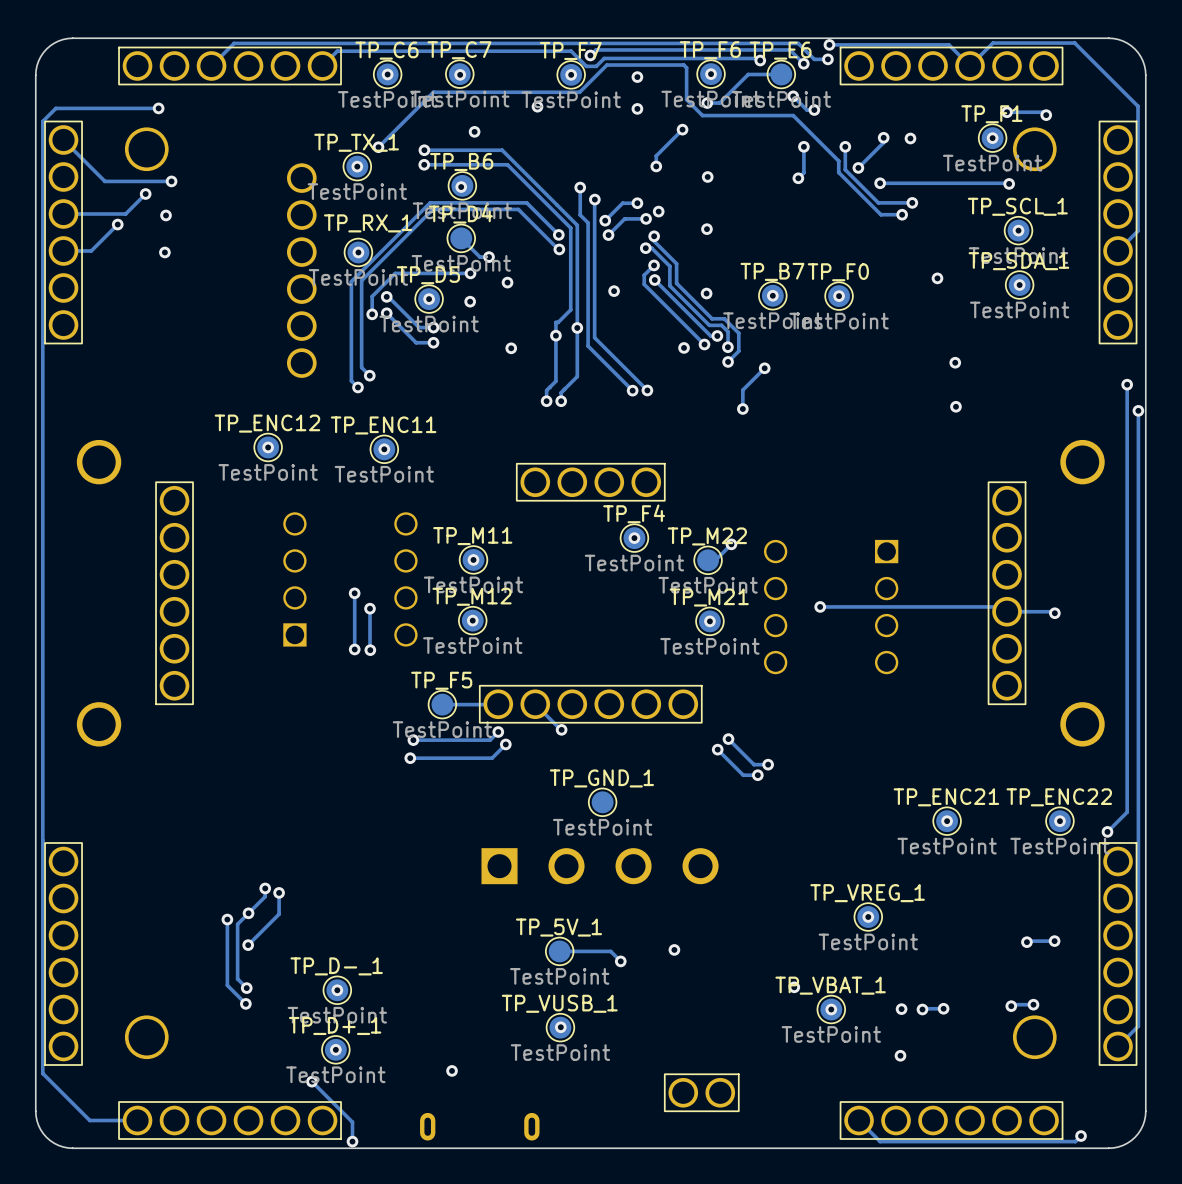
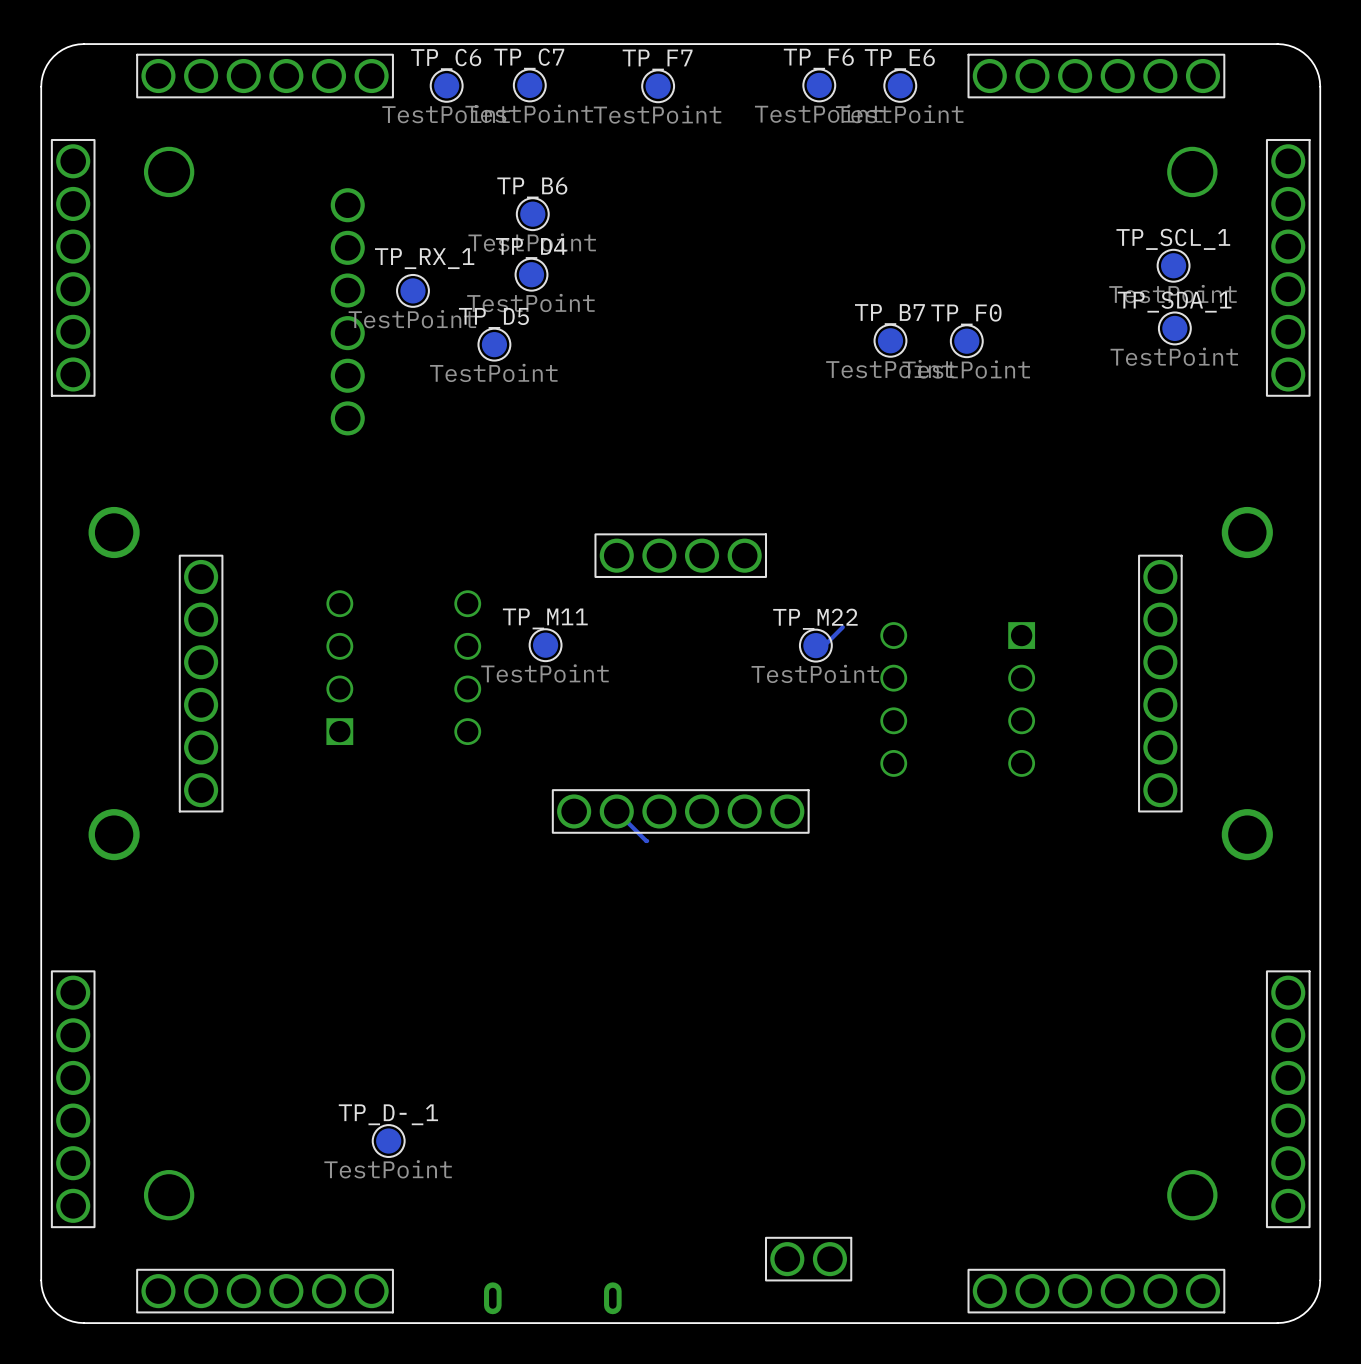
track: (829, 44) (948, 44) (970, 65) (992, 43) (1074, 43) (1138, 106) (1138, 231) (1118, 250) -> none
via: (829, 44) -> none
track: (590, 55) (595, 49) (789, 49) (803, 63) -> none
via: (590, 55) -> none
track: (827, 59) (814, 59) (798, 43) (234, 43) (211, 65) -> none
via: (827, 59) -> none
track: (760, 60) (758, 58) (604, 58) (596, 66) (586, 66) (571, 51) (337, 51) (322, 65) -> none
via: (760, 60) -> none
via: (803, 63) -> none
via: (387, 74) -> none
via: (460, 74) -> none
via: (571, 74) -> none
via: (711, 74) -> none
track: (781, 74) (748, 74) (719, 103) (707, 103) -> none
via: (637, 77) -> none
track: (793, 96) (806, 110) (814, 110) -> none
via: (793, 96) -> none
via: (707, 103) -> none
via: (537, 106) -> none
track: (158, 108) (55, 108) (42, 121) (42, 1073) (89, 1120) (137, 1120) -> none
via: (158, 108) -> none
via: (637, 108) -> none
via: (814, 110) -> none
track: (1007, 112) (1043, 112) (1046, 115) -> none
via: (1007, 112) -> none
via: (1046, 115) -> none
track: (682, 129) (656, 155) (656, 166) -> none
via: (682, 129) -> none
via: (474, 131) -> none
track: (883, 137) (883, 142) (858, 167) -> none
via: (883, 137) -> none
via: (910, 138) -> none
TP_F1: TestPoint (992, 138) -> none
via: (992, 138) -> none
track: (63, 139) (104, 181) (171, 181) -> none
track: (803, 146) (803, 172) (798, 178) -> none
via: (803, 146) -> none
track: (845, 146) (845, 169) (878, 202) (912, 202) -> none
via: (845, 146) -> none
track: (378, 147) (433, 92) (579, 92) (606, 65) (683, 65) (686, 67) (686, 99) (702, 115) (793, 115) (838, 161) (838, 172) (880, 214) (902, 214) -> none
via: (378, 147) -> none
track: (424, 150) (502, 150) (577, 225) (577, 376) (561, 392) (561, 401) -> none
via: (424, 150) -> none
track: (424, 164) (507, 164) (570, 228) (570, 309) (555, 322) (555, 381) (546, 390) (546, 401) -> none
via: (424, 164) -> none
TP_TX_1: TestPoint (357, 166) -> none
via: (357, 166) -> none
via: (656, 166) -> none
via: (858, 167) -> none
via: (707, 176) -> none
via: (798, 178) -> none
via: (171, 181) -> none
track: (880, 183) (1009, 183) -> none
via: (880, 183) -> none
via: (1009, 183) -> none
via: (461, 187) -> none
track: (580, 187) (580, 214) (588, 222) (588, 346) (632, 390) -> none
via: (580, 187) -> none
track: (145, 194) (125, 213) (63, 213) -> none
via: (145, 194) -> none
track: (594, 199) (594, 337) (647, 390) -> none
via: (594, 199) -> none
via: (912, 202) -> none
track: (637, 203) (622, 203) (605, 220) -> none
via: (637, 203) -> none
via: (658, 211) -> none
via: (902, 214) -> none
via: (166, 215) -> none
track: (646, 218) (624, 218) (608, 235) -> none
via: (646, 218) -> none
via: (605, 220) -> none
track: (117, 224) (91, 250) (63, 250) -> none
via: (117, 224) -> none
via: (706, 229) -> none
via: (1018, 230) -> none
track: (558, 234) (526, 202) (430, 202) (351, 281) (351, 380) (357, 387) -> none
via: (558, 234) -> none
via: (608, 235) -> none
track: (654, 236) (654, 241) (676, 263) (676, 283) (712, 318) (724, 318) (738, 333) (738, 351) (728, 361) -> none
via: (654, 236) -> none
track: (461, 238) (479, 257) (489, 257) -> none
track: (645, 248) (651, 248) (669, 266) (669, 285) (709, 325) (721, 325) (728, 331) (728, 347) -> none
via: (645, 248) -> none
track: (559, 249) (518, 209) (432, 209) (361, 280) (361, 367) (369, 375) -> none
via: (559, 249) -> none
via: (164, 252) -> none
via: (358, 252) -> none
via: (489, 257) -> none
track: (654, 265) (644, 275) (644, 284) (704, 344) -> none
via: (654, 265) -> none
track: (470, 273) (395, 273) (372, 296) (372, 314) -> none
via: (470, 273) -> none
via: (937, 278) -> none
track: (654, 280) (710, 335) (717, 335) -> none
via: (654, 280) -> none
via: (507, 282) -> none
via: (1019, 285) -> none
via: (614, 291) -> none
via: (706, 293) -> none
via: (772, 295) -> none
track: (386, 296) (419, 327) (433, 327) -> none
via: (386, 296) -> none
via: (839, 296) -> none
via: (429, 299) -> none
via: (470, 301) -> none
track: (386, 313) (416, 342) (433, 342) -> none
via: (386, 313) -> none
via: (372, 314) -> none
via: (433, 327) -> none
via: (577, 327) -> none
via: (555, 335) -> none
via: (717, 335) -> none
via: (433, 342) -> none
via: (704, 344) -> none
via: (684, 347) -> none
via: (727, 347) -> none
via: (511, 348) -> none
via: (728, 361) -> none
via: (955, 362) -> none
track: (764, 368) (742, 390) (742, 408) -> none
via: (764, 368) -> none
via: (369, 375) -> none
track: (1127, 384) (1127, 812) (1107, 831) -> none
via: (1127, 384) -> none
via: (357, 387) -> none
via: (632, 390) -> none
via: (647, 390) -> none
via: (546, 401) -> none
via: (561, 401) -> none
via: (955, 406) -> none
via: (742, 408) -> none
track: (1138, 410) (1138, 1026) (1118, 1046) -> none
via: (1138, 410) -> none
TP_ENC12: TestPoint (268, 447) -> none
via: (268, 447) -> none
TP_ENC11: TestPoint (384, 449) -> none
via: (384, 449) -> none
TP_F4: TestPoint (634, 538) -> none
via: (634, 538) -> none
via: (731, 544) -> none
via: (473, 559) -> none
track: (354, 593) (354, 649) -> none
via: (354, 593) -> none
track: (820, 606) (1002, 606) (1007, 611) (1054, 613) -> none
via: (820, 606) -> none
track: (370, 608) (370, 650) -> none
via: (370, 608) -> none
via: (1054, 613) -> none
TP_M12: TestPoint (472, 620) -> none
via: (472, 620) -> none
TP_M21: TestPoint (709, 621) -> none
via: (709, 621) -> none
via: (354, 649) -> none
via: (370, 650) -> none
TP_F5: TestPoint (442, 704) -> none
track: (498, 704) (442, 704) -> none
via: (561, 729) -> none
track: (498, 732) (490, 740) (413, 740) -> none
via: (498, 732) -> none
track: (728, 739) (754, 764) (768, 764) -> none
via: (728, 739) -> none
via: (413, 740) -> none
track: (505, 744) (492, 758) (410, 758) -> none
via: (505, 744) -> none
track: (717, 749) (743, 775) (757, 775) -> none
via: (717, 749) -> none
via: (410, 758) -> none
via: (768, 764) -> none
via: (757, 775) -> none
TP_GND_1: TestPoint (602, 802) -> none
TP_ENC21: TestPoint (947, 821) -> none
via: (947, 821) -> none
TP_ENC22: TestPoint (1059, 821) -> none
via: (1059, 821) -> none
via: (1107, 831) -> none
part: (600, 866) -> none
track: (265, 888) (265, 896) (237, 924) (237, 978) (246, 988) -> none
via: (265, 888) -> none
track: (279, 892) (279, 914) (248, 945) -> none
via: (279, 892) -> none
via: (248, 913) -> none
TP_VREG_1: TestPoint (868, 917) -> none
via: (868, 917) -> none
track: (227, 919) (227, 985) (245, 1003) -> none
via: (227, 919) -> none
track: (1054, 941) (1026, 942) -> none
via: (1054, 941) -> none
via: (1026, 942) -> none
via: (248, 945) -> none
via: (674, 949) -> none
track: (559, 951) (610, 951) (620, 961) -> none
TP_5V_1: TestPoint (559, 951) -> none
via: (620, 961) -> none
via: (794, 987) -> none
via: (246, 988) -> none
via: (337, 990) -> none
via: (245, 1003) -> none
track: (1033, 1004) (1011, 1006) -> none
via: (1033, 1004) -> none
via: (1011, 1006) -> none
track: (943, 1008) (922, 1009) -> none
via: (943, 1008) -> none
TP_VBAT_1: TestPoint (831, 1009) -> none
via: (831, 1009) -> none
via: (901, 1009) -> none
via: (922, 1009) -> none
TP_VUSB_1: TestPoint (560, 1027) -> none
via: (560, 1027) -> none
TP_D+_1: TestPoint (335, 1049) -> none
via: (335, 1049) -> none
via: (900, 1055) -> none
via: (452, 1070) -> none
track: (311, 1081) (352, 1122) (352, 1141) -> none
via: (311, 1081) -> none
track: (859, 1120) (880, 1141) (1075, 1141) (1081, 1136) -> none
via: (1081, 1136) -> none
via: (352, 1141) -> none

